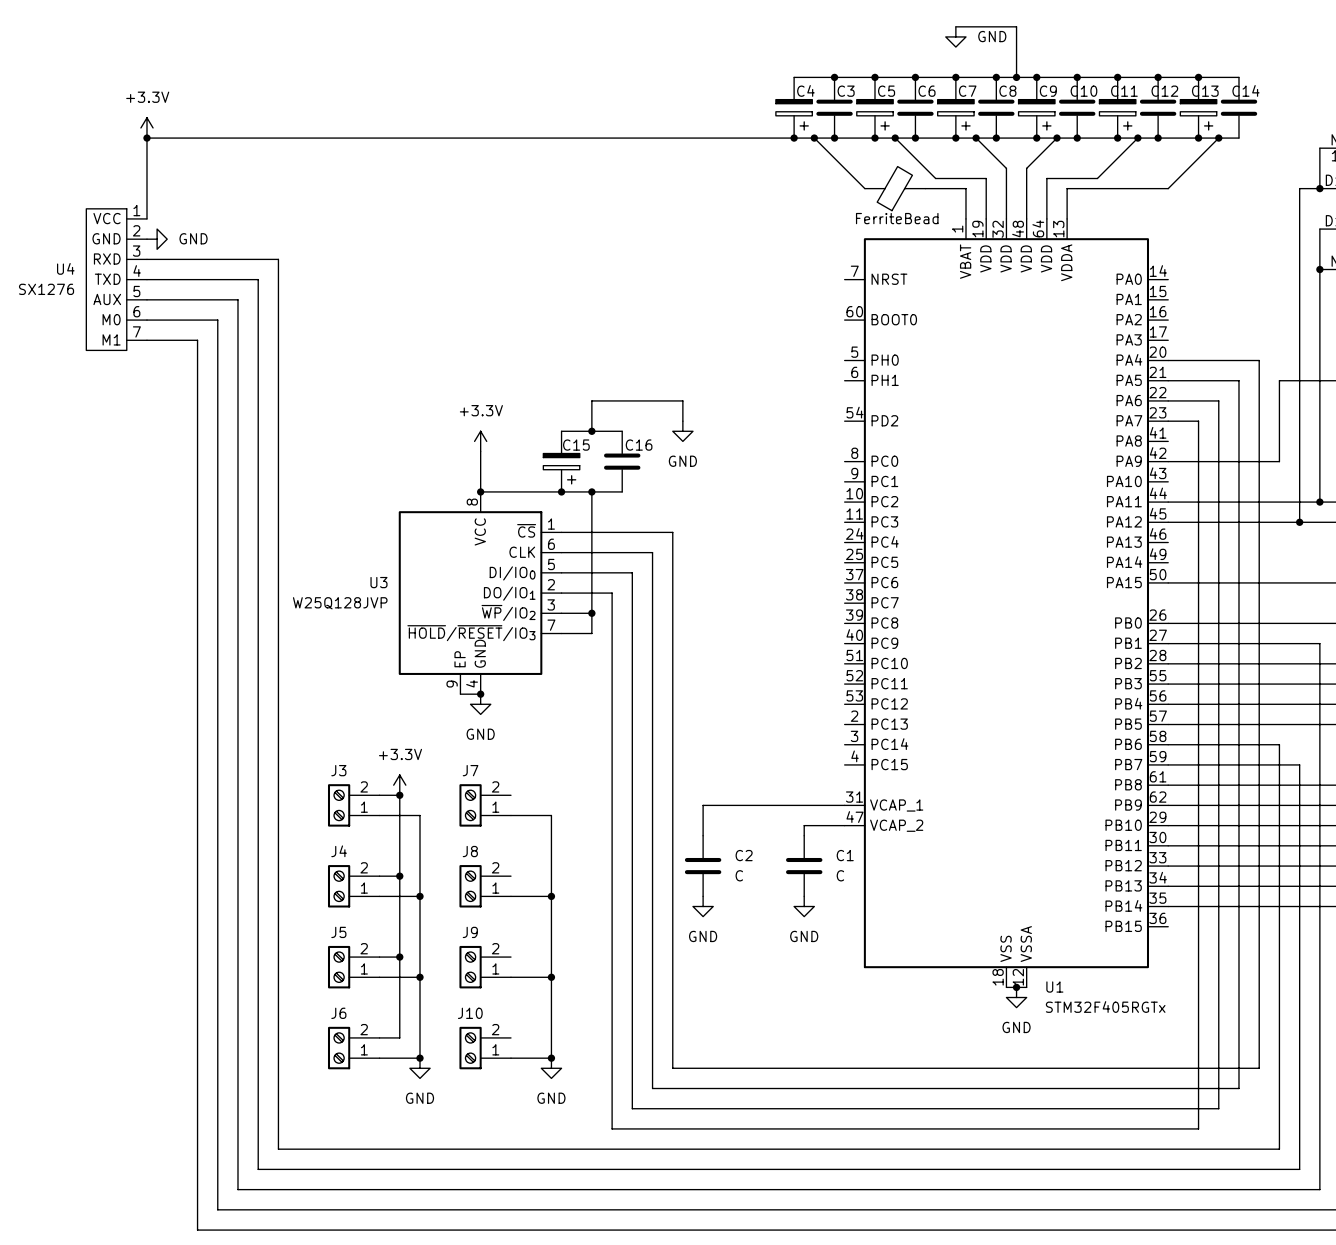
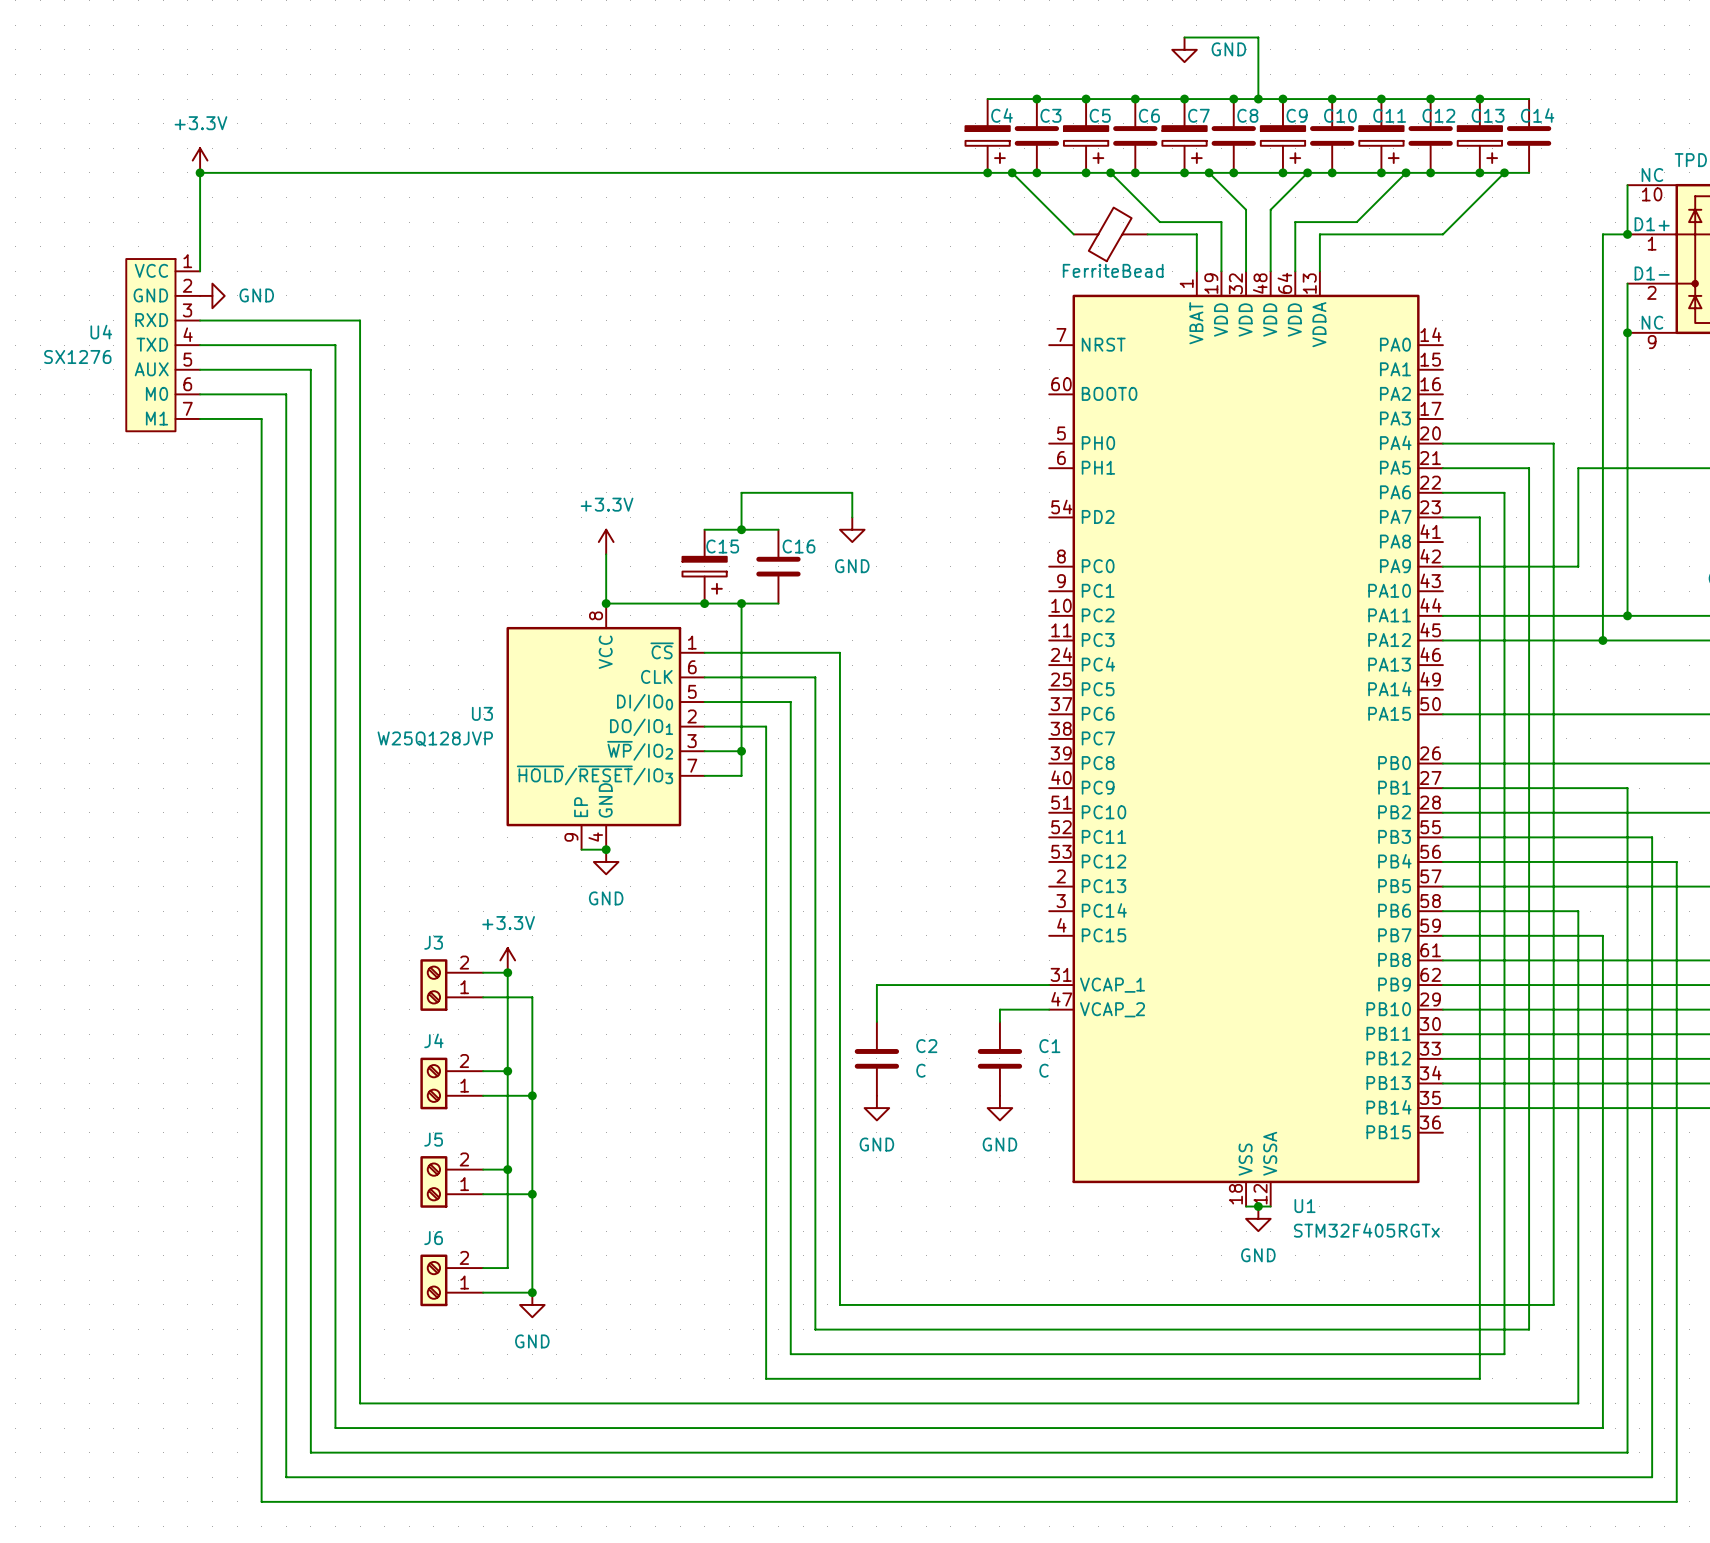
J7: (485, 805) -> none
wire: (510, 815) (551, 815) (551, 1058) (510, 1058) -> none
J8: (485, 886) -> none
wire: (510, 896) (551, 896) -> none
junction: (551, 896) -> none
J9: (485, 967) -> none
wire: (510, 977) (551, 977) -> none
junction: (551, 977) -> none
J10: (485, 1048) -> none
junction: (551, 1058) -> none
power symbol: GND (551, 1068) -> none

